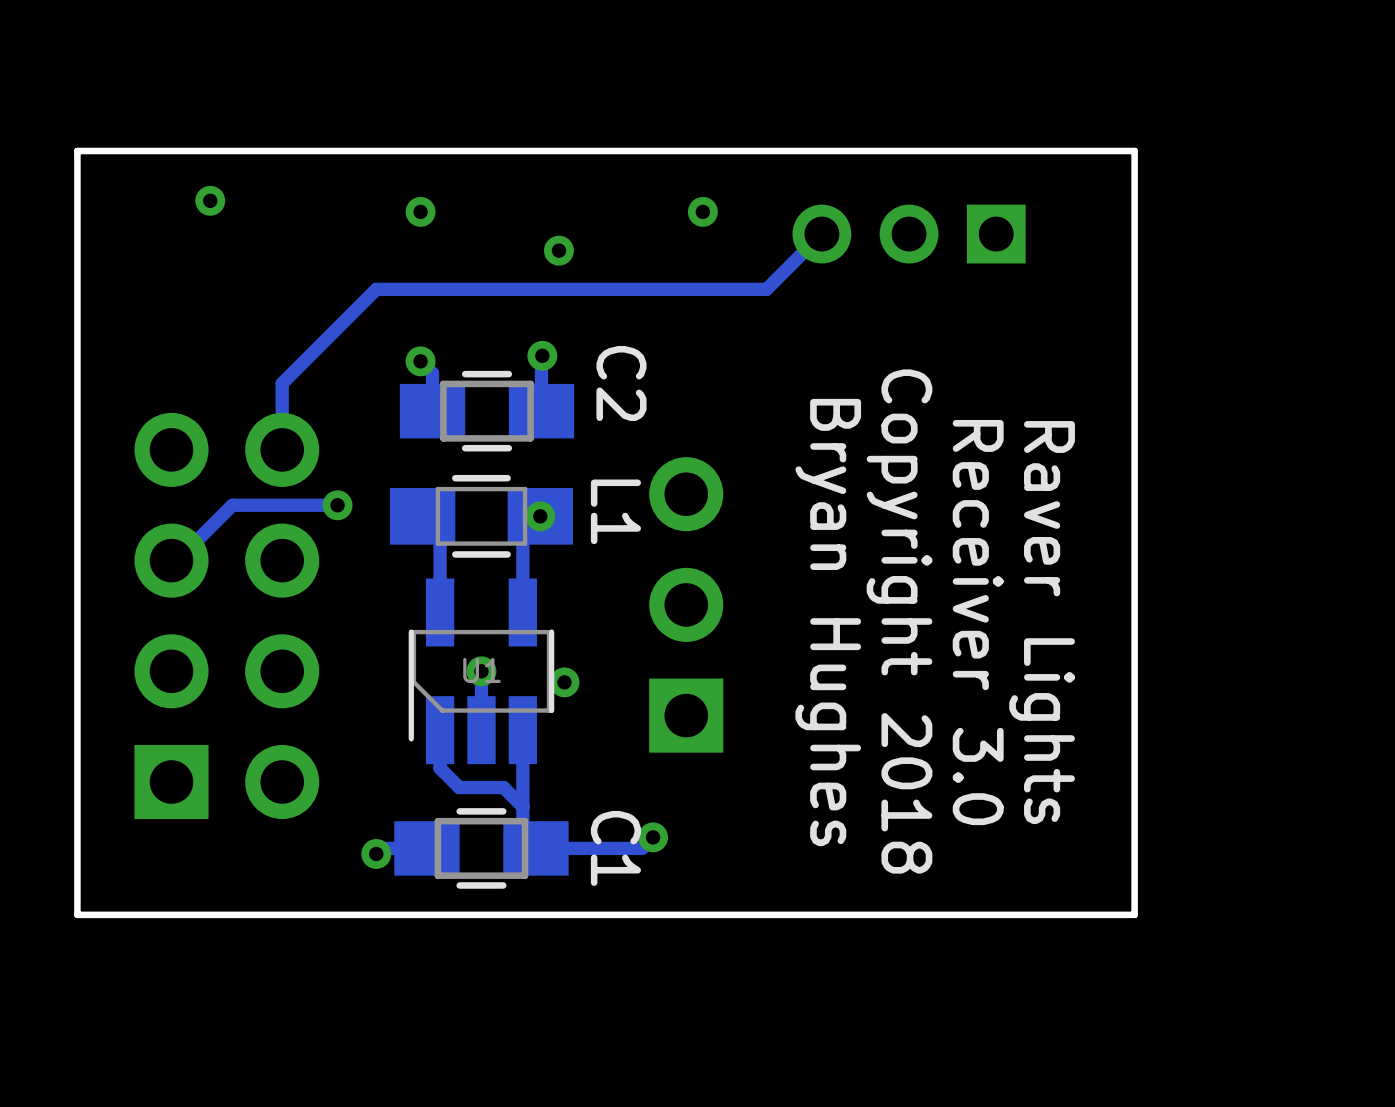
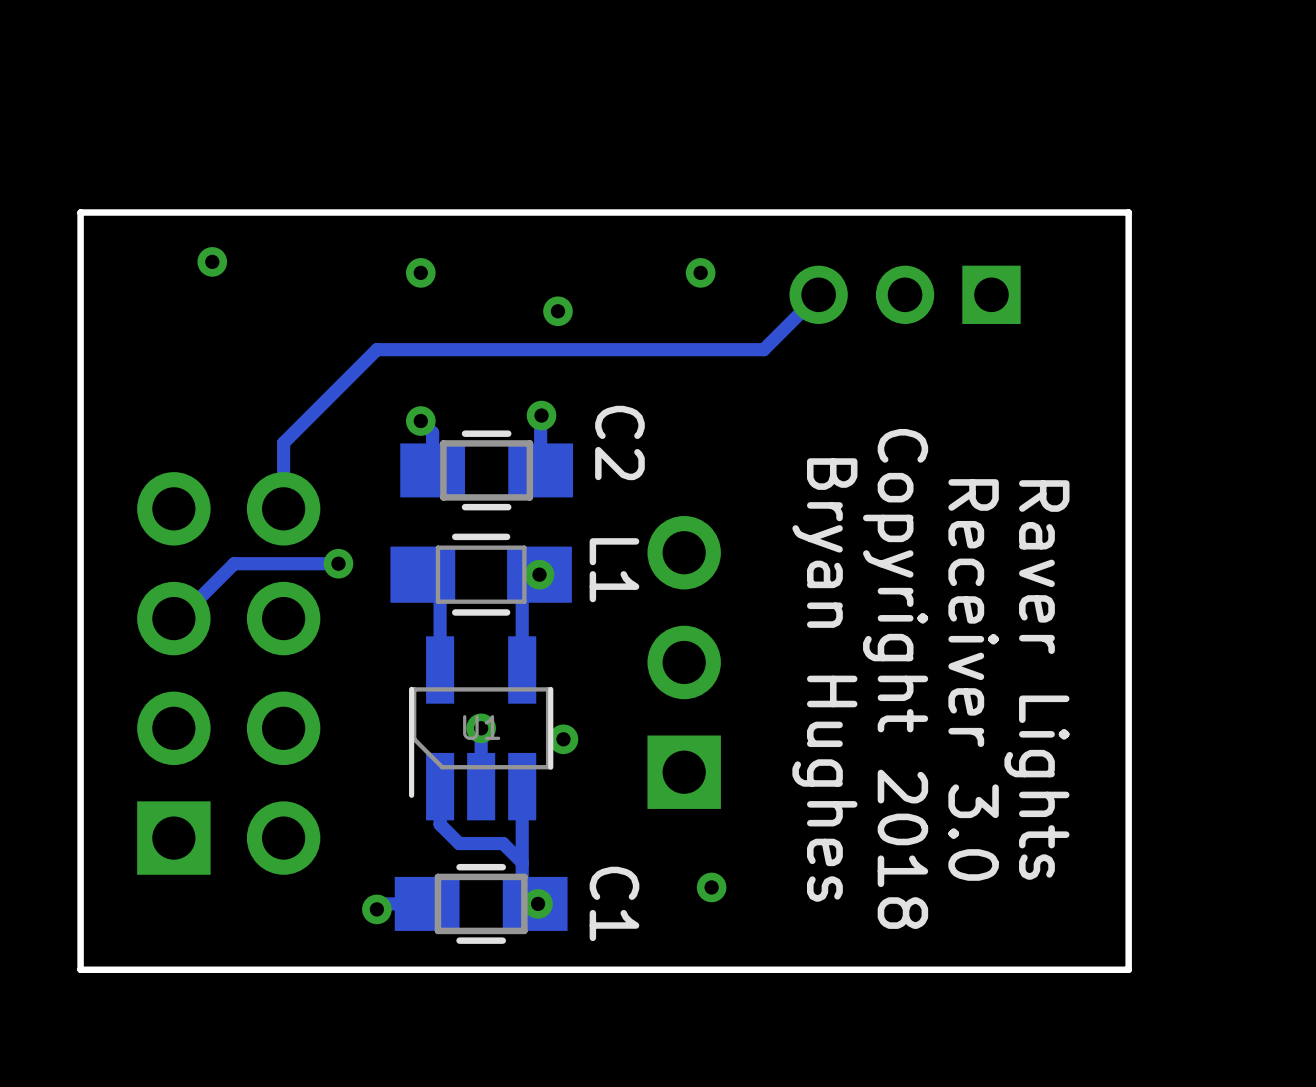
via: none -> (711, 887)
track: (653, 837) (641, 848) (538, 848) -> none
via: (653, 837) -> none
via: none -> (538, 903)

